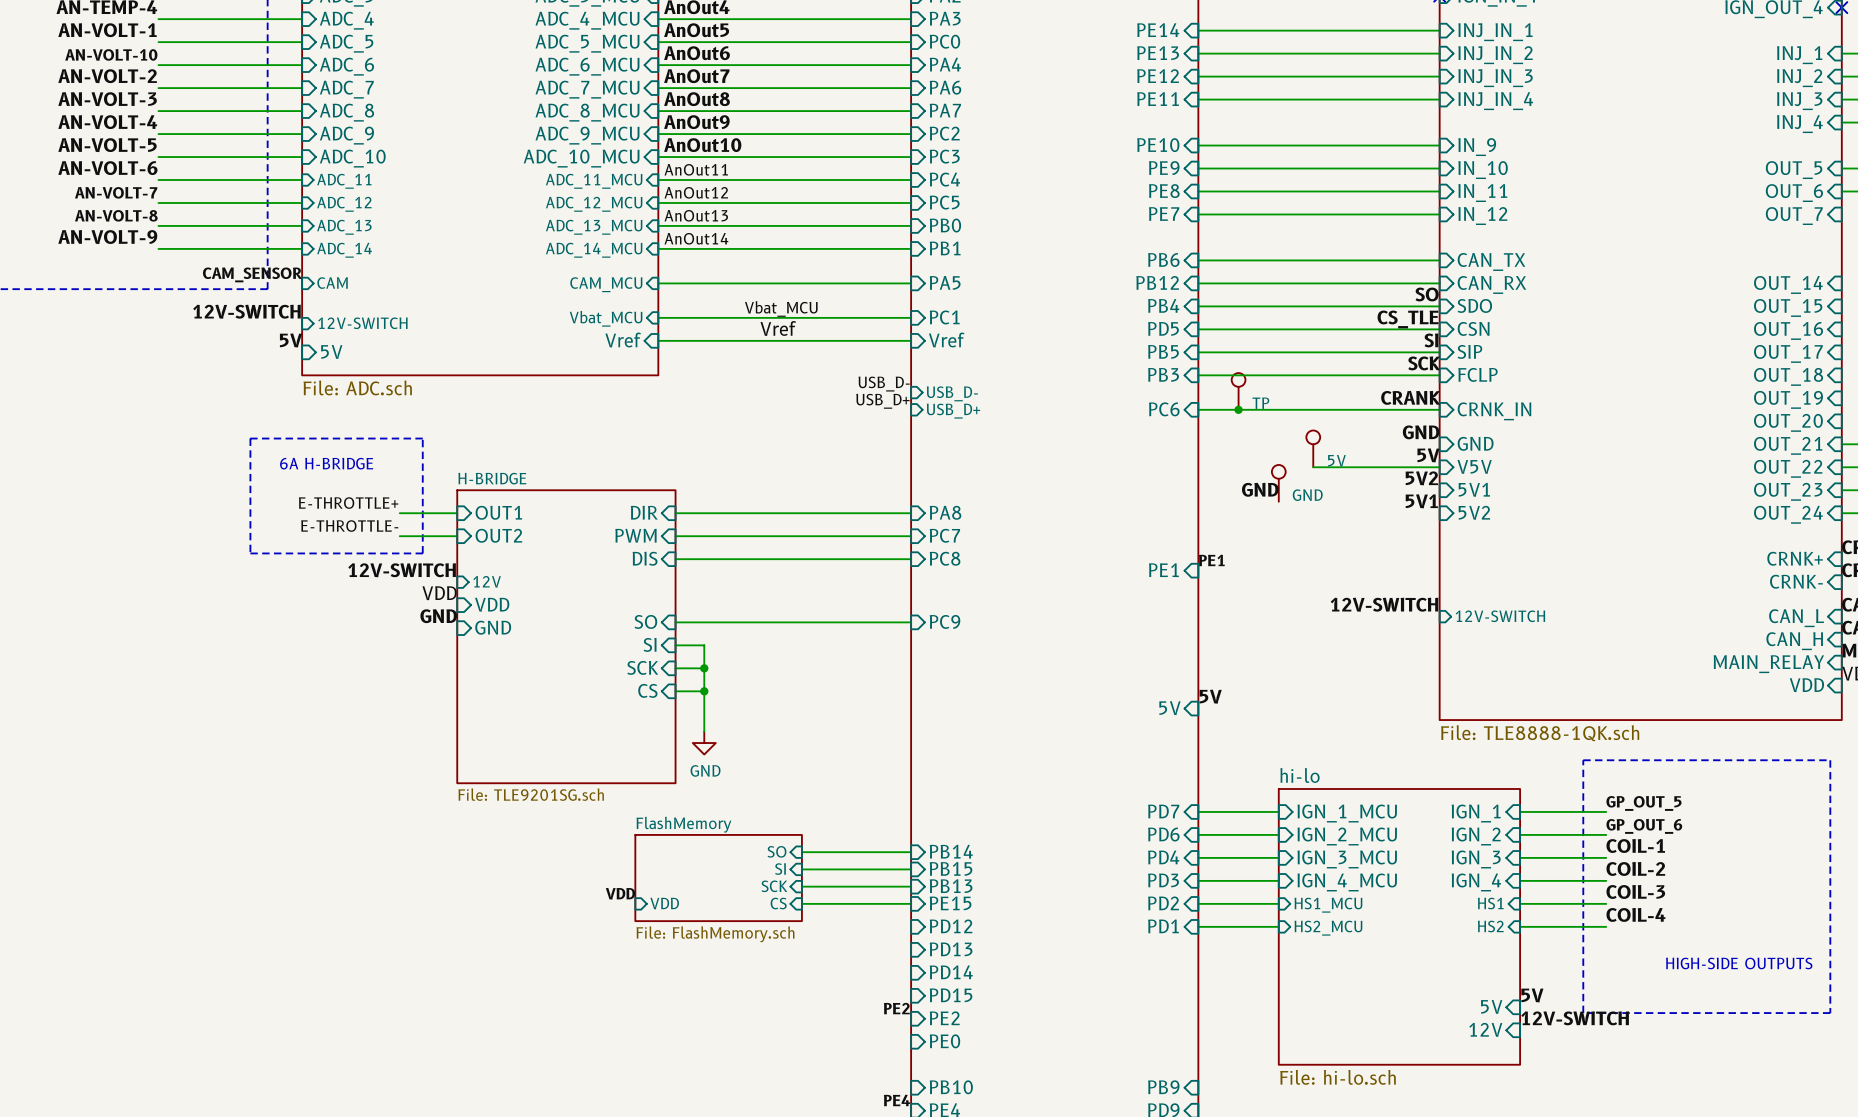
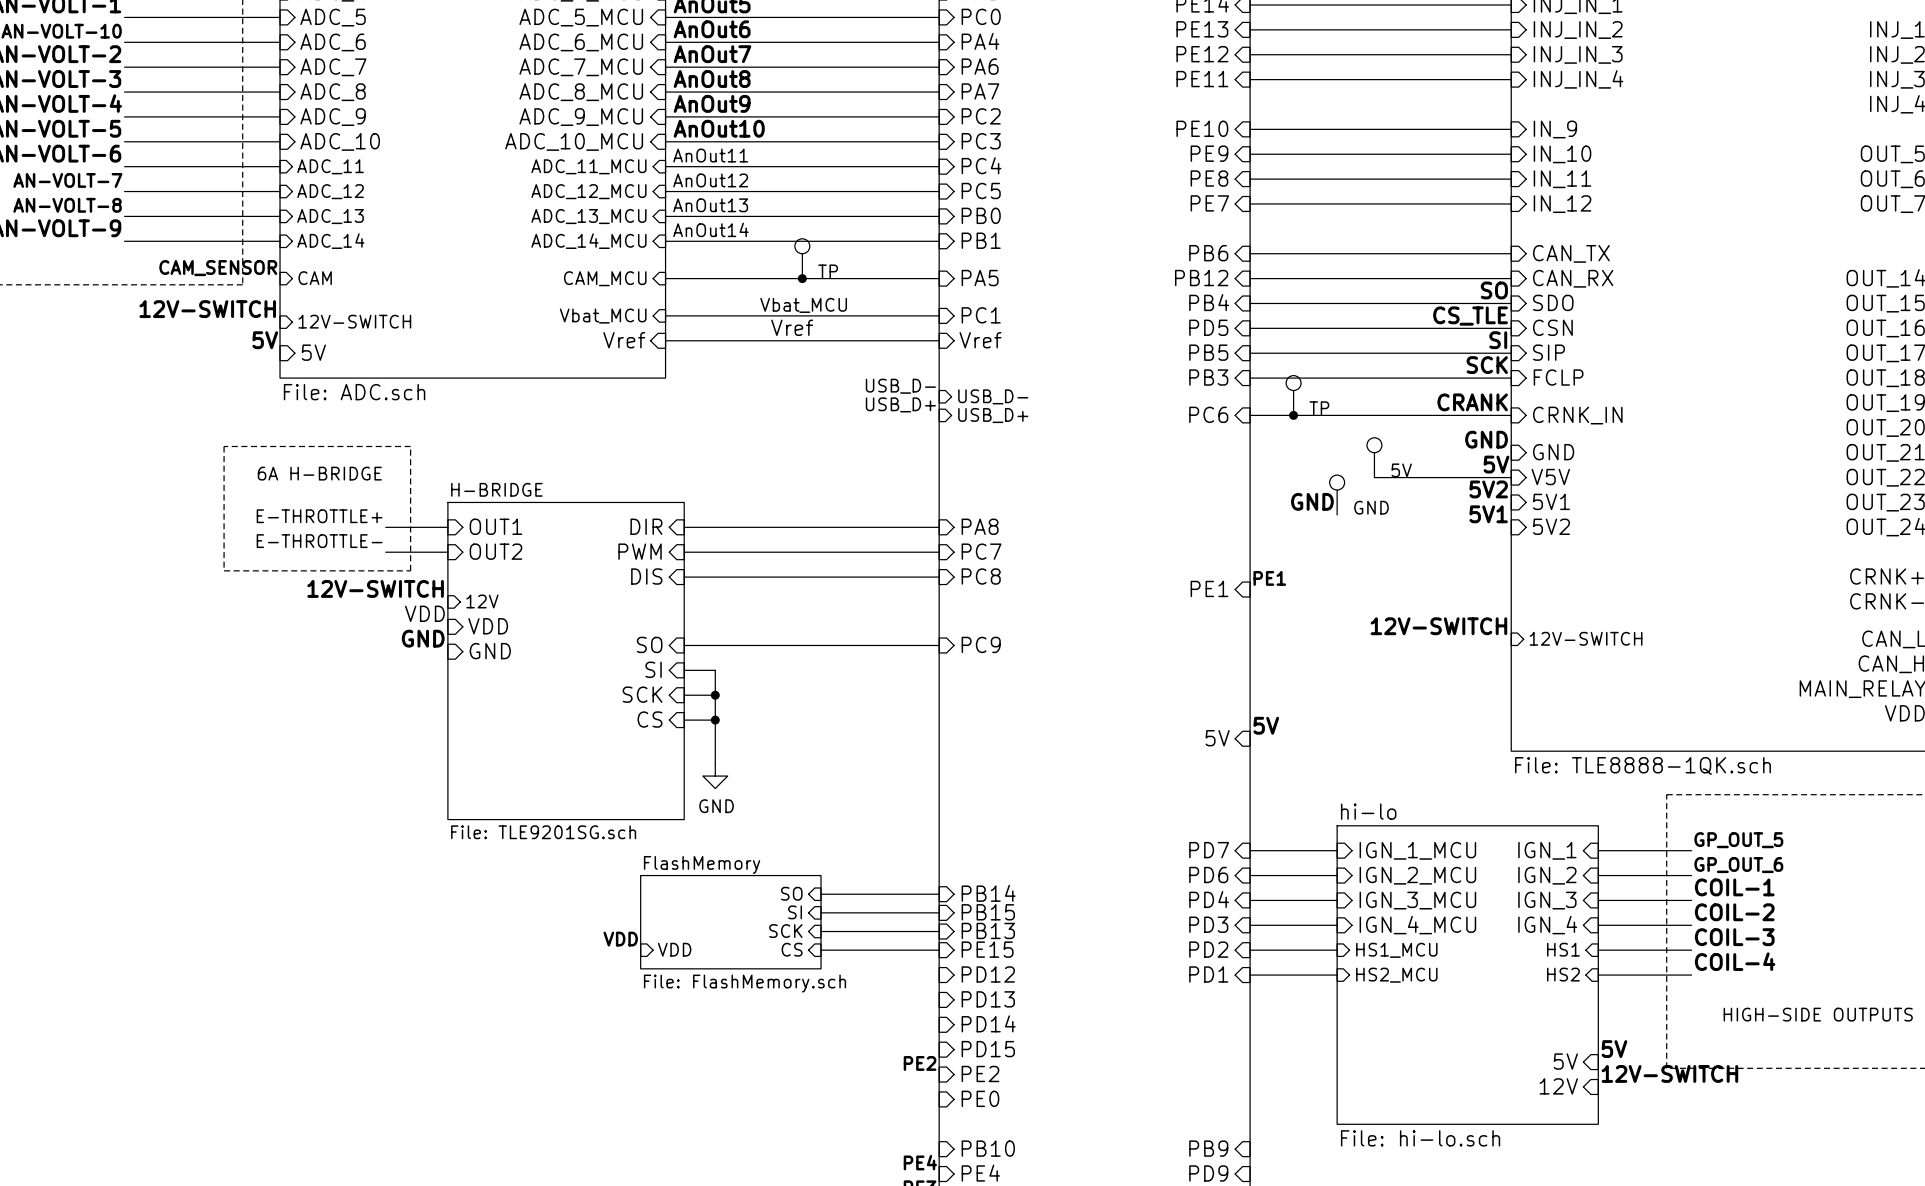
part: none -> TP (802, 258)
junction: none -> (802, 278)

